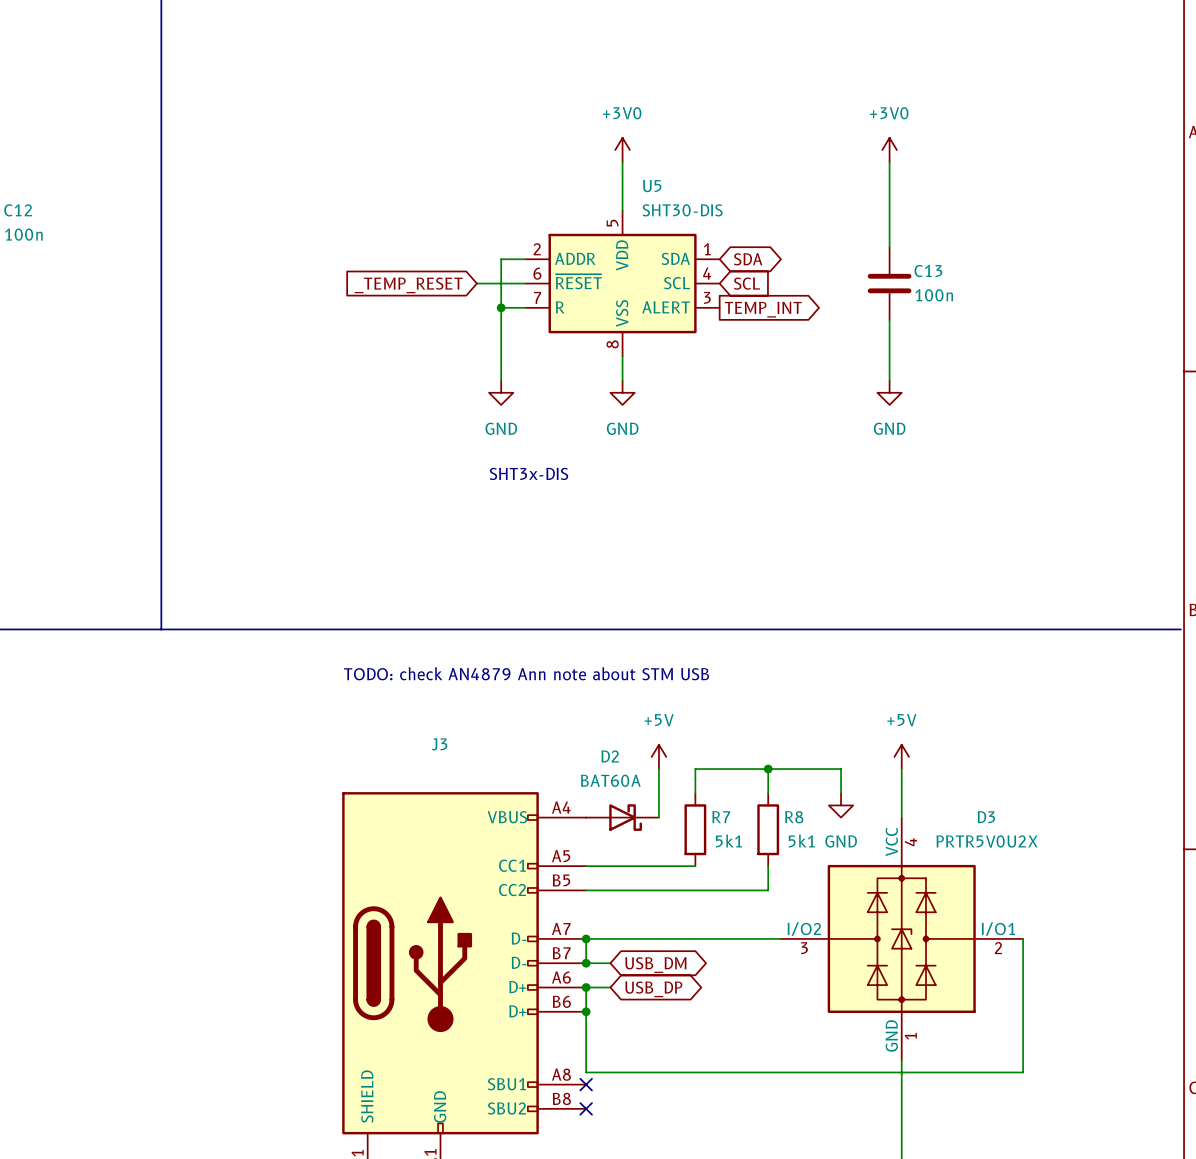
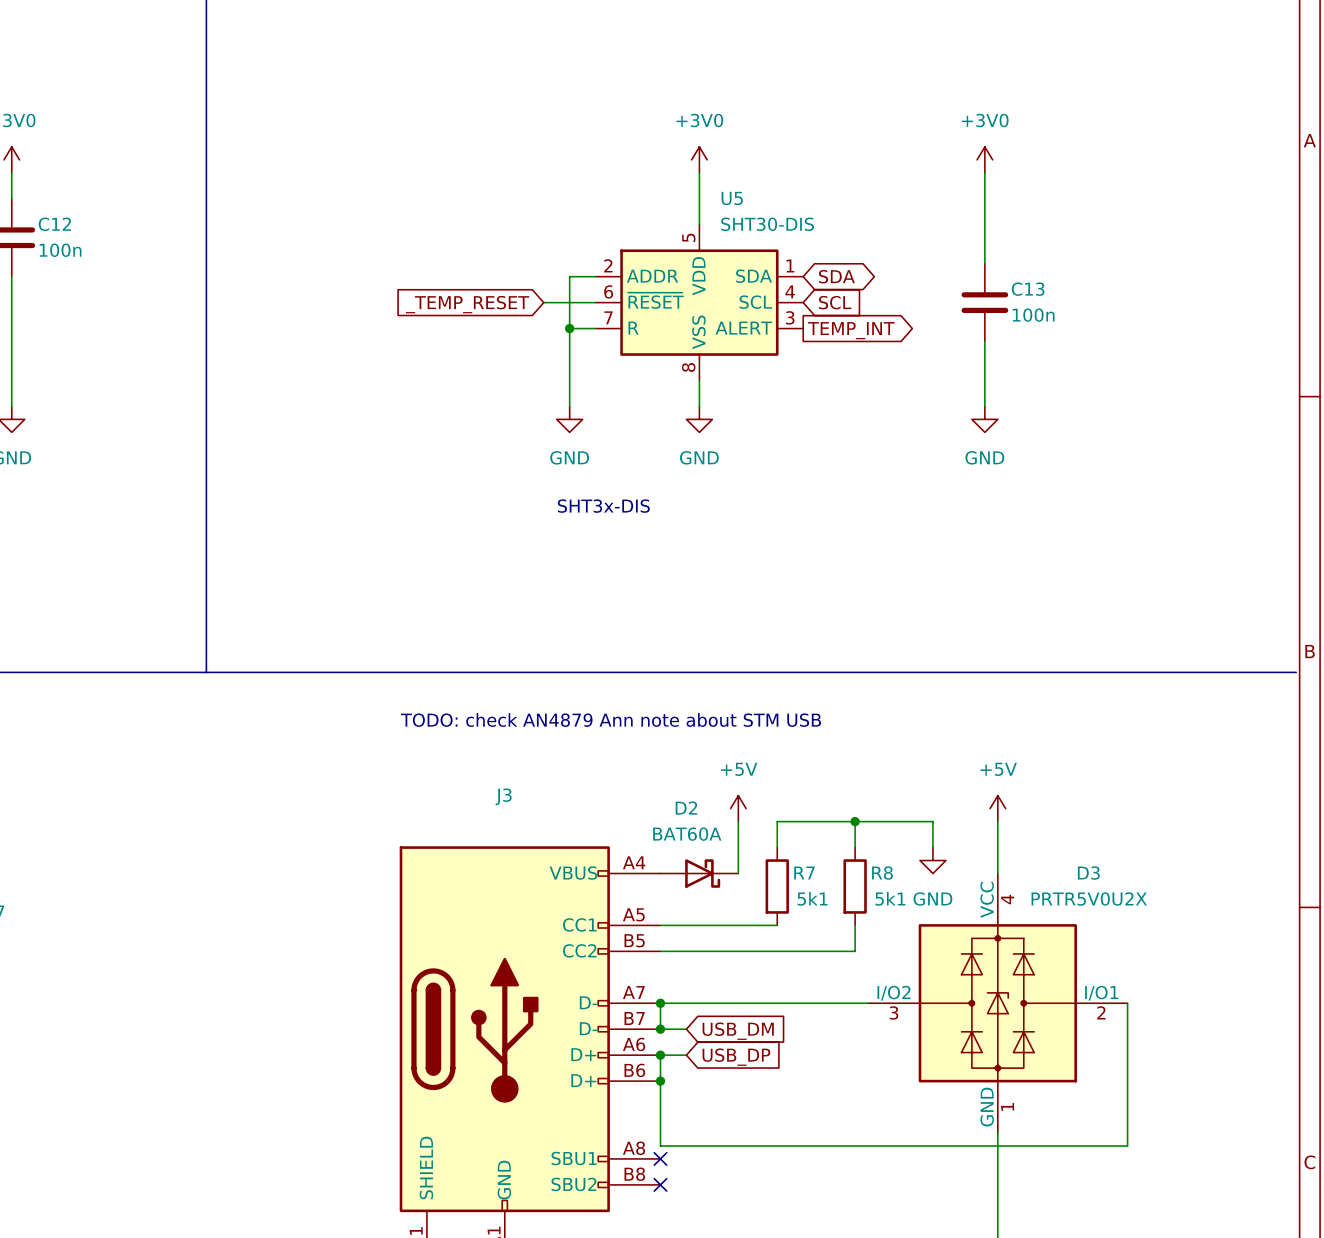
global label shape: bidirectional (655, 965) -> input (738, 1031)
global label shape: bidirectional (653, 989) -> input (736, 1057)

